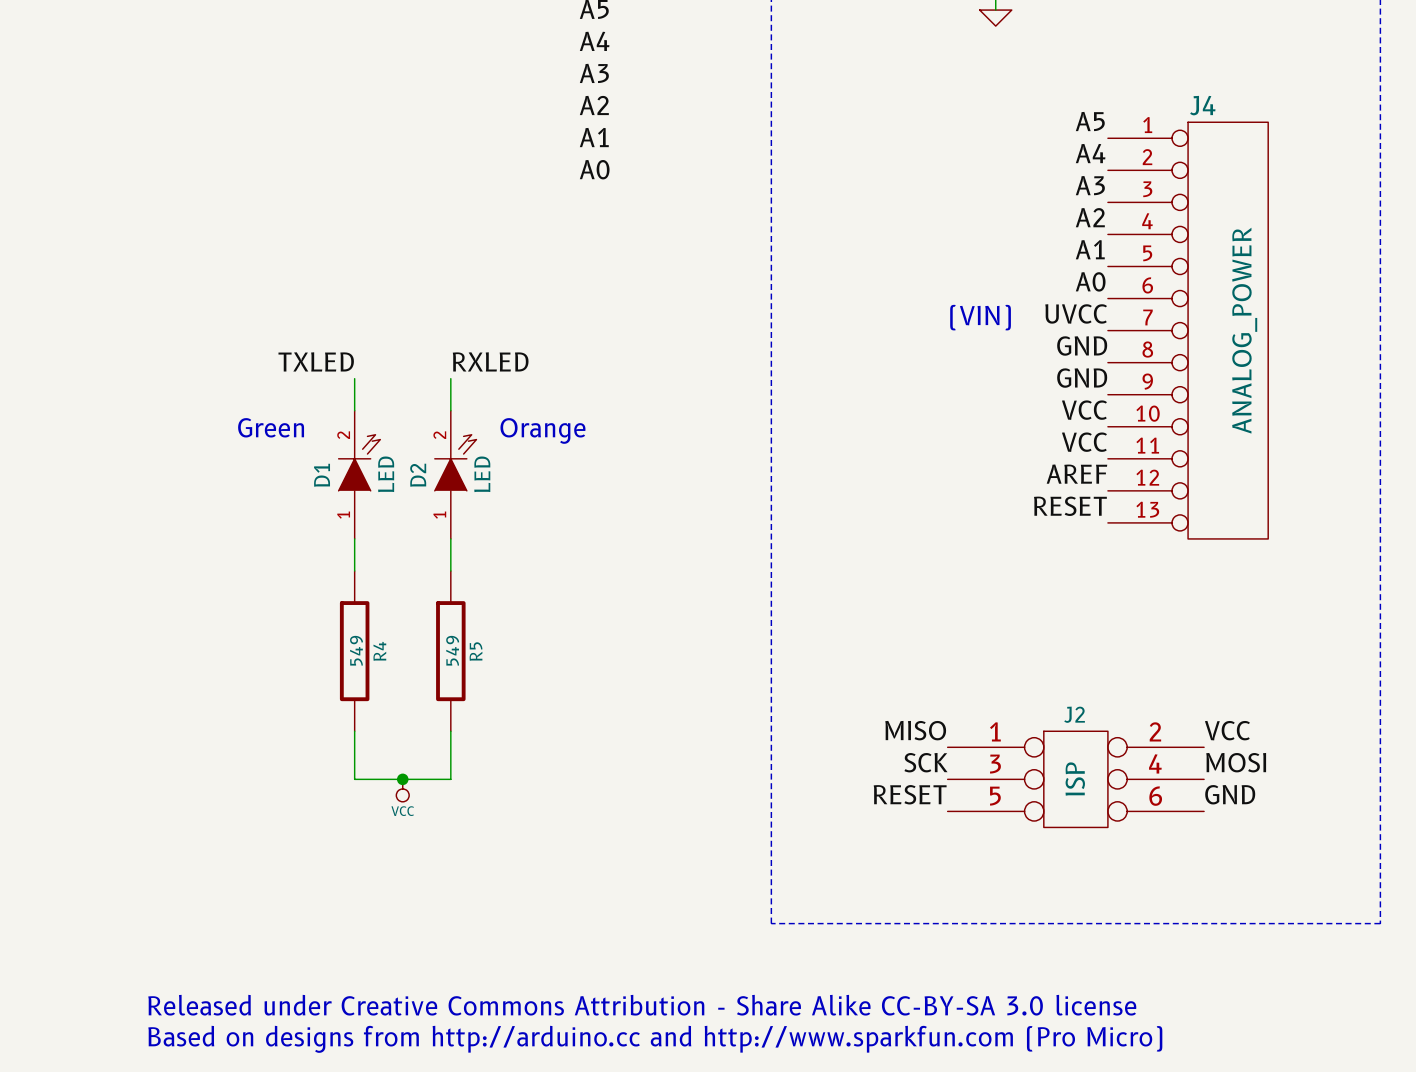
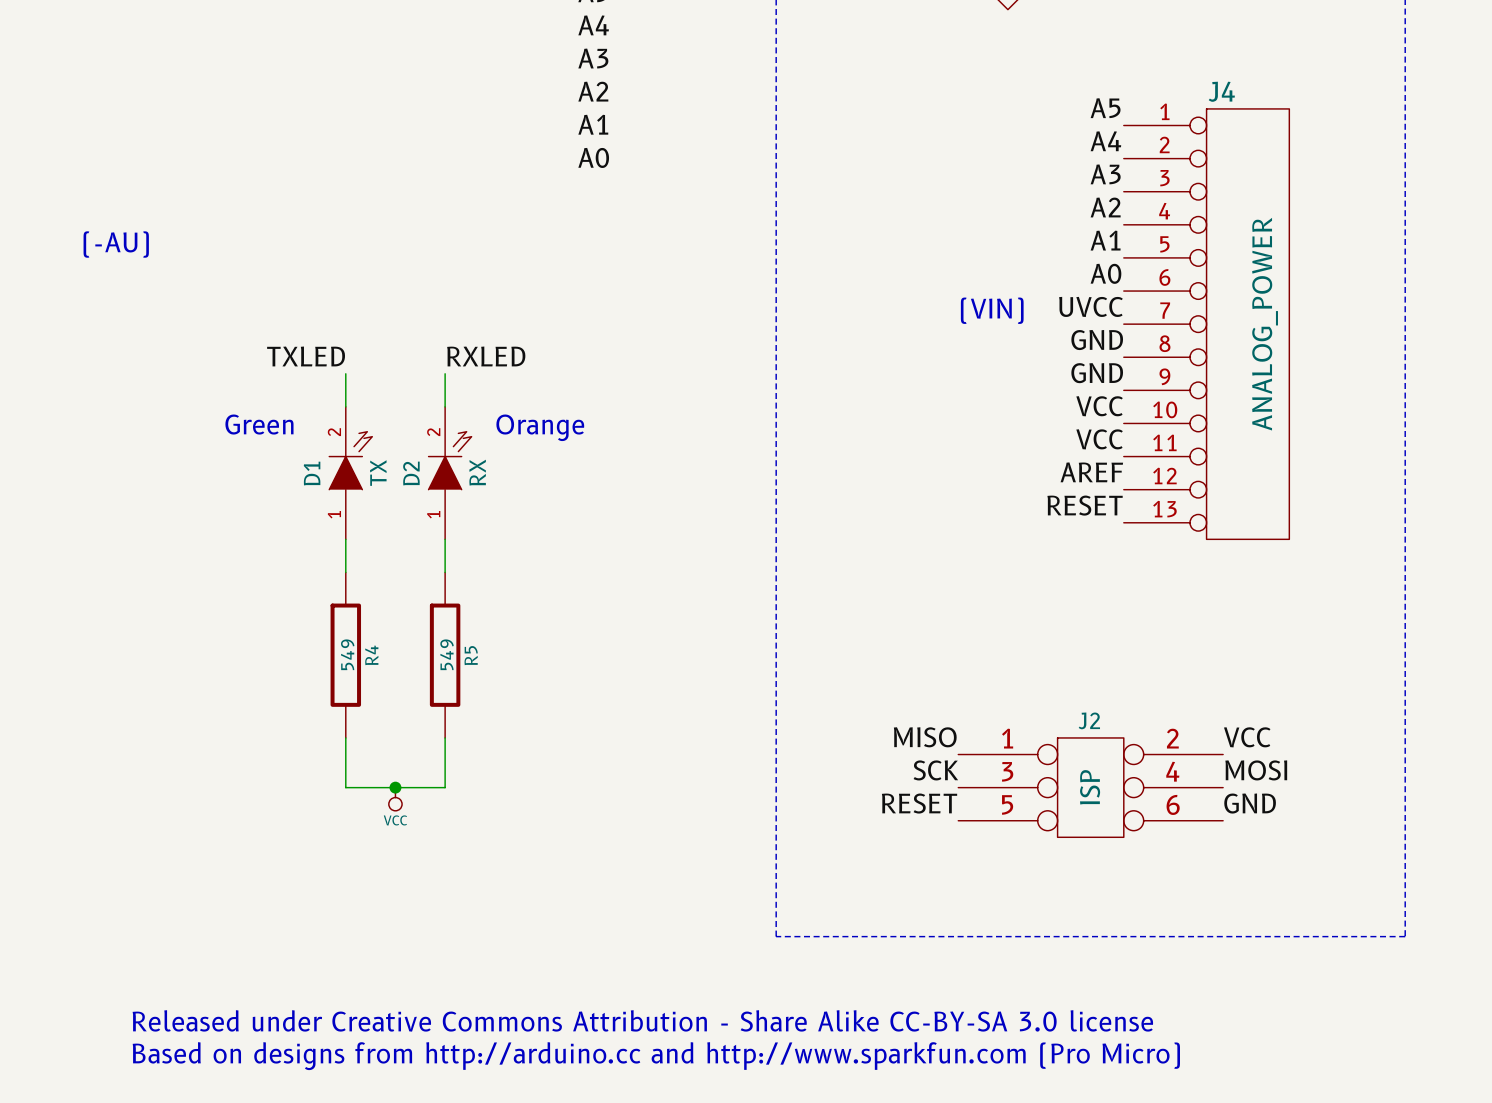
text: none -> (-AU) (116, 244)
D1 value: LED (386, 474) -> TX (378, 473)
D2 value: LED (482, 474) -> RX (477, 472)

